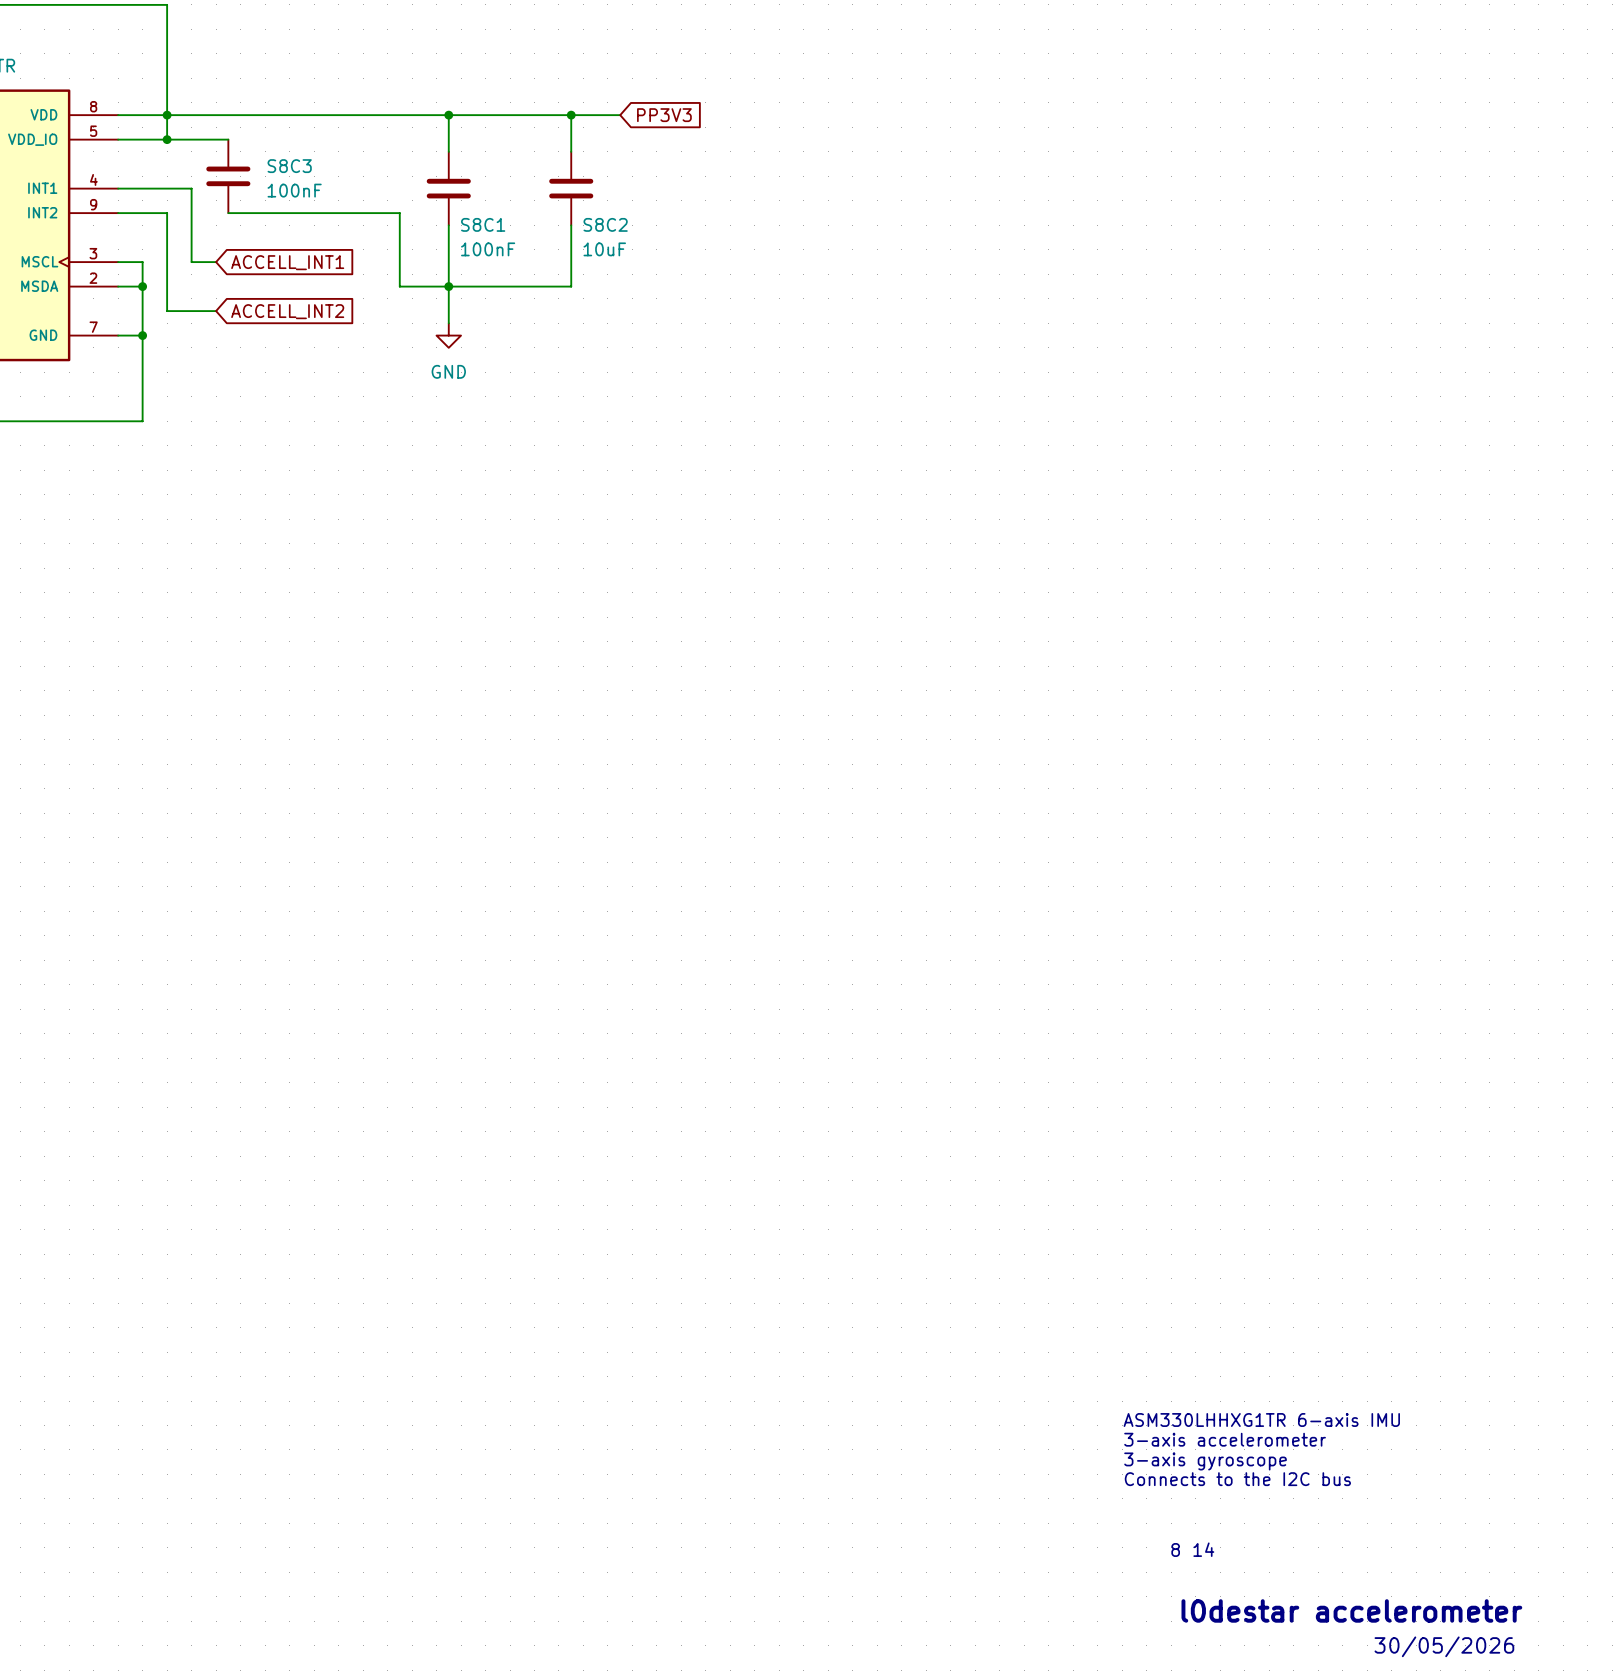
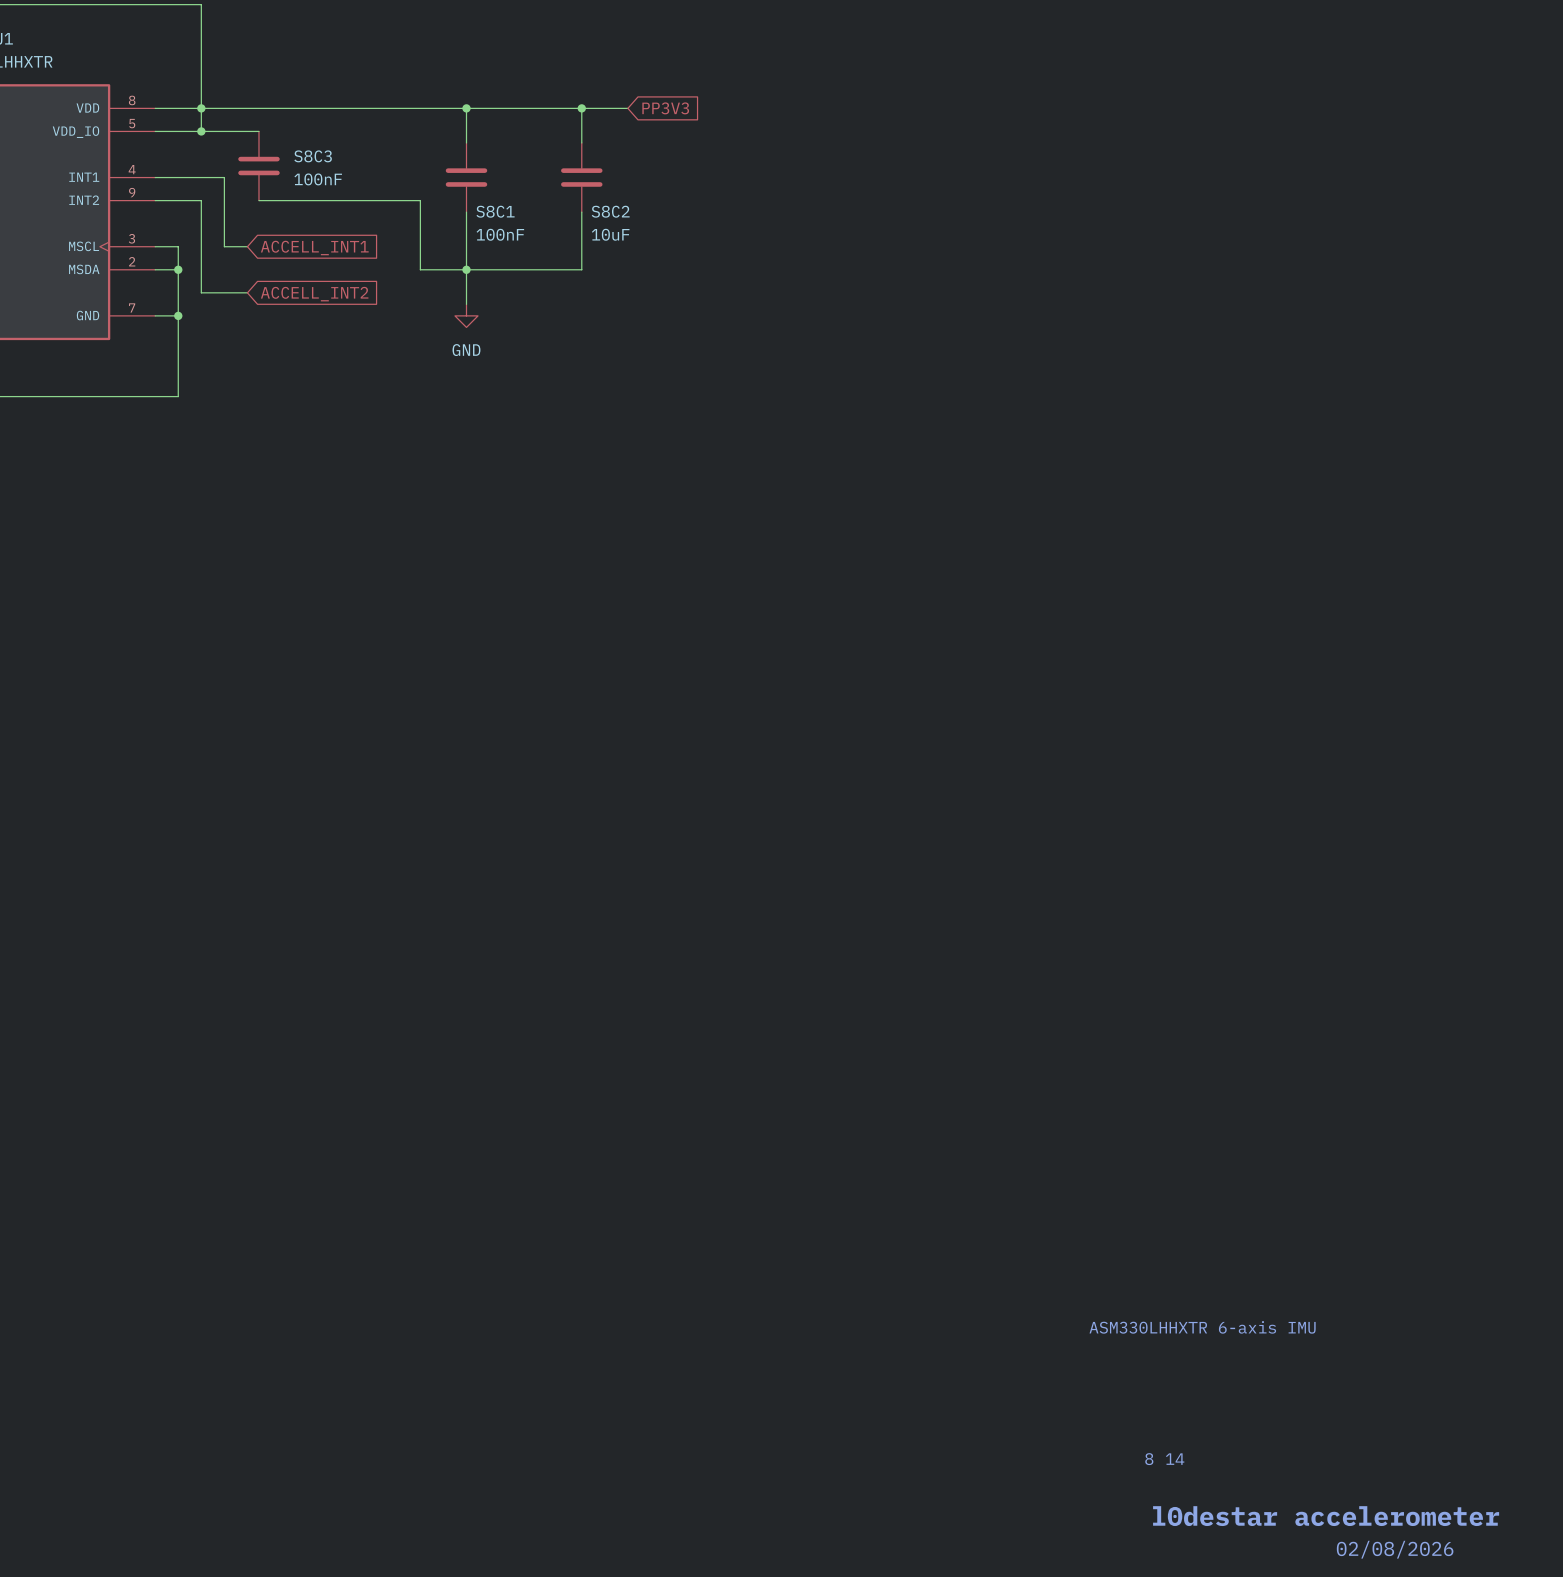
text: ASM330LHHXG1TR 6-axis IMU (1261, 1419) -> ASM330LHHXTR 6-axis IMU (1202, 1327)
text: 3-axis accelerometer (1225, 1439) -> none
text: 3-axis gyroscope (1205, 1461) -> none
text: Connects to the I2C bus (1237, 1479) -> none
text: 30/05/2026 (1444, 1646) -> 02/08/2026 (1395, 1549)

